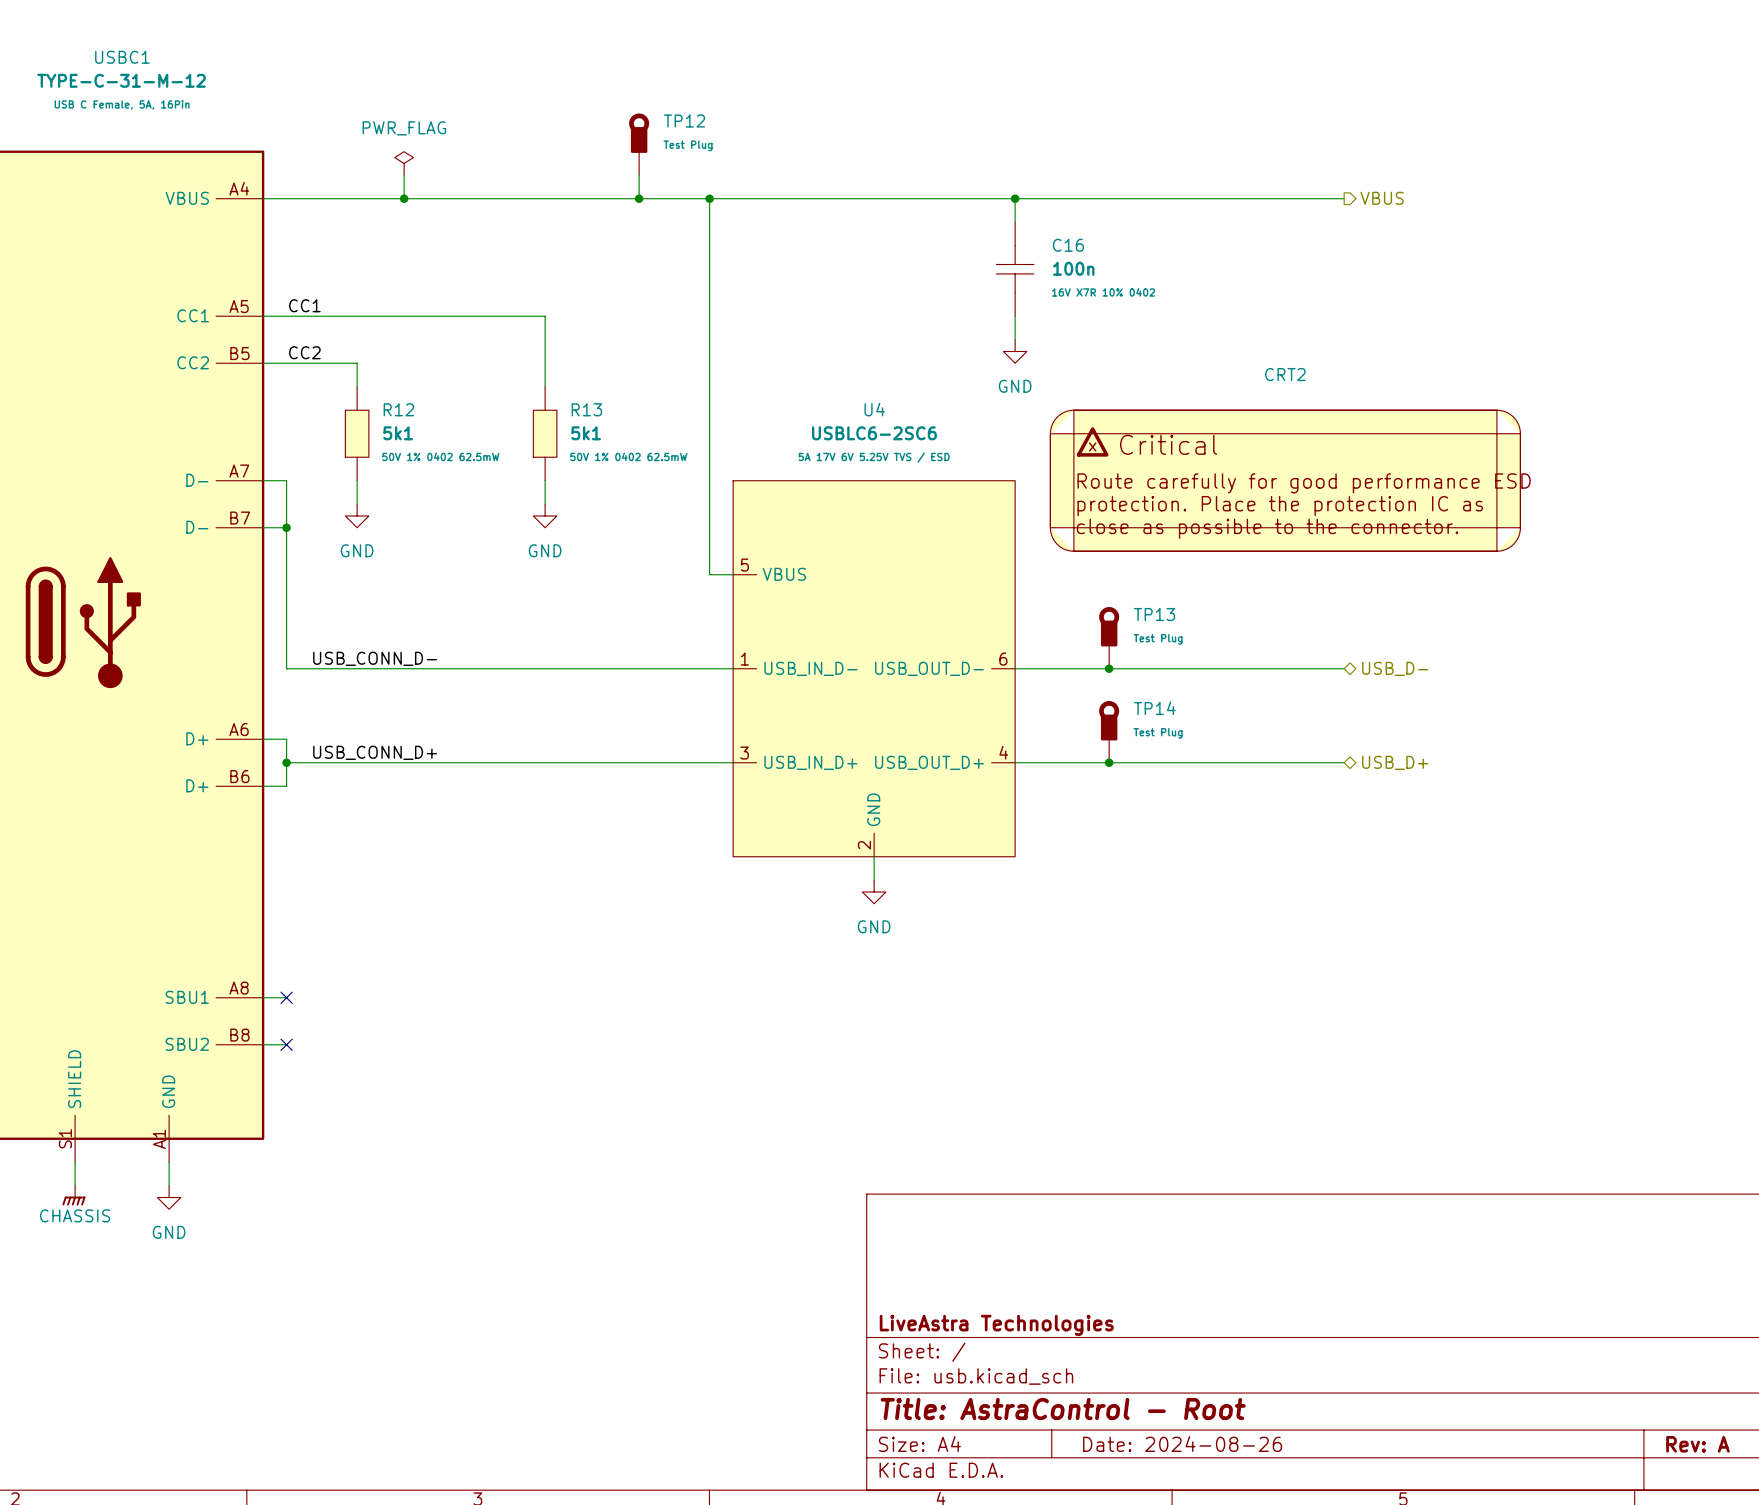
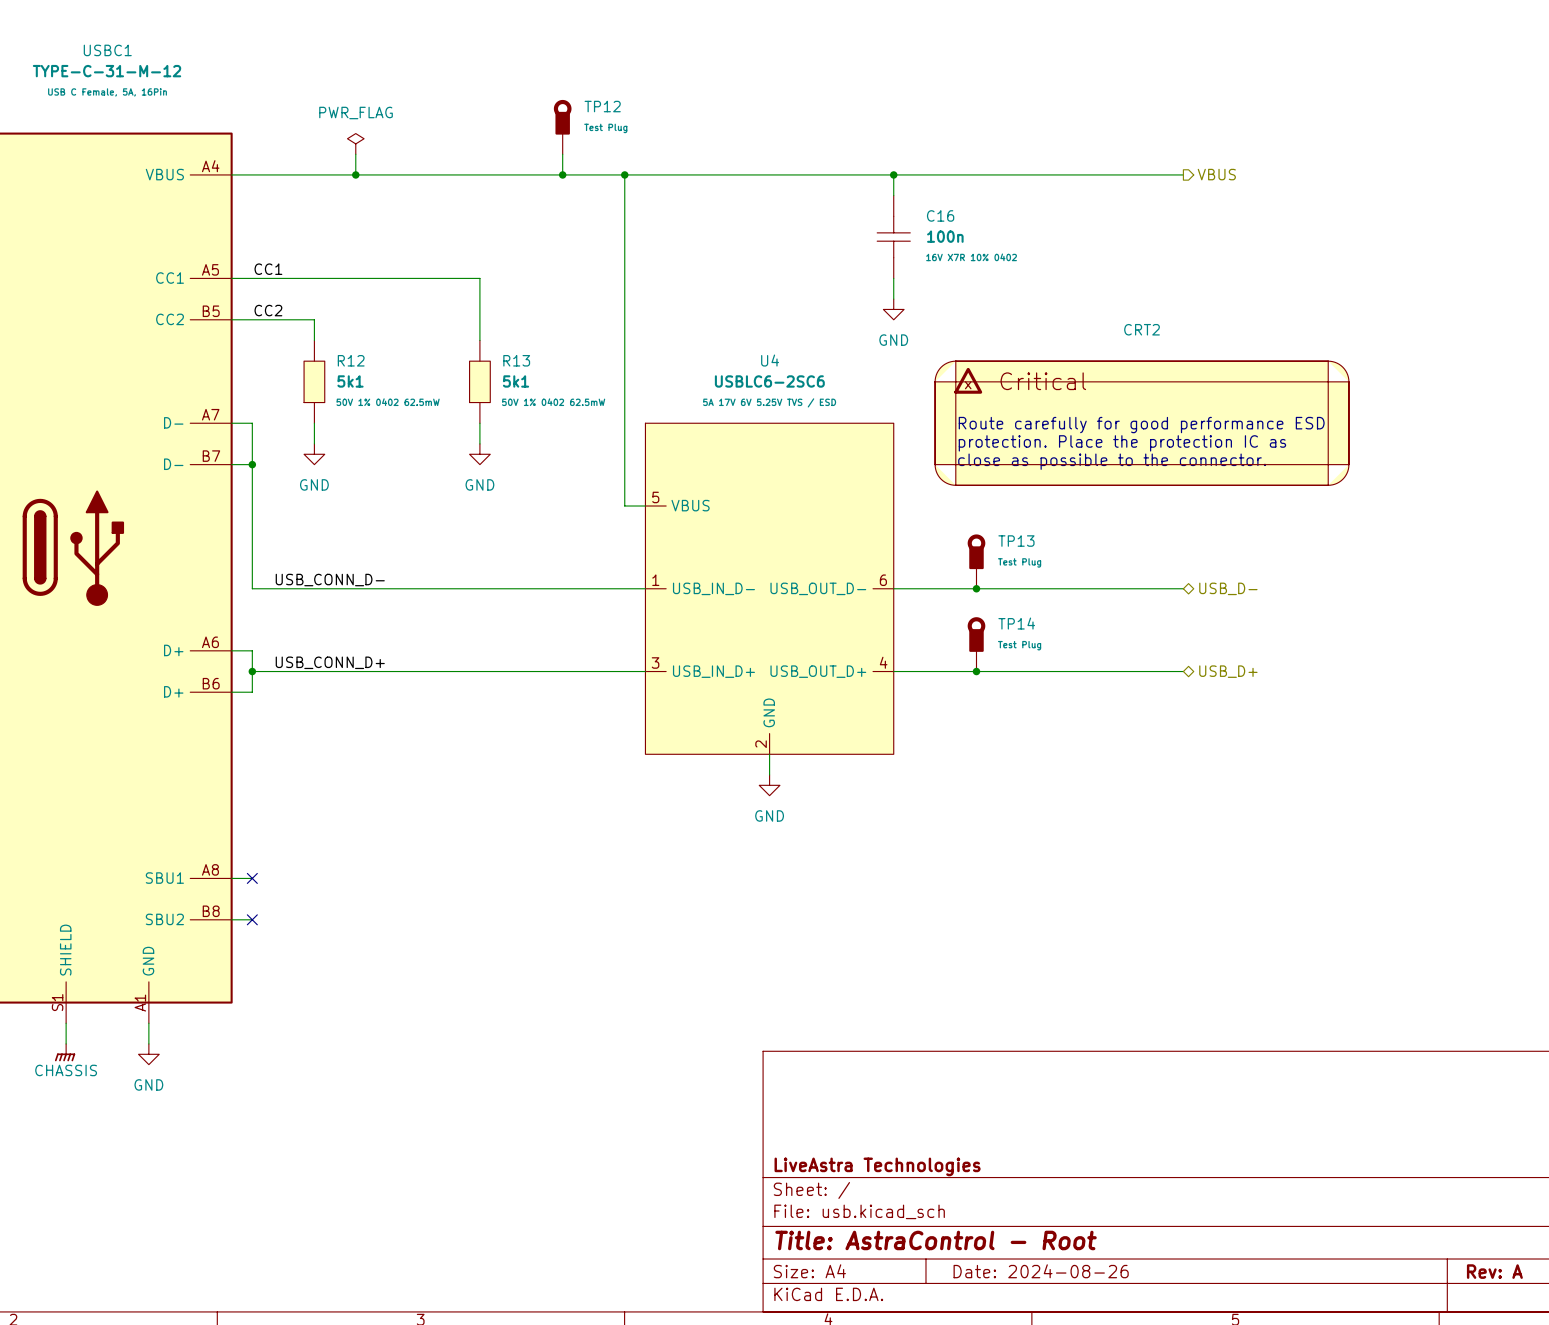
CRT2 symbol: [1050, 410, 1521, 552] -> [935, 361, 1349, 486]
text: none -> Route carefully for good performance ESD (1141, 425)
text: none -> protection. Place the protection IC as (1122, 443)
text: none -> close as possible to the connector. (1112, 461)

